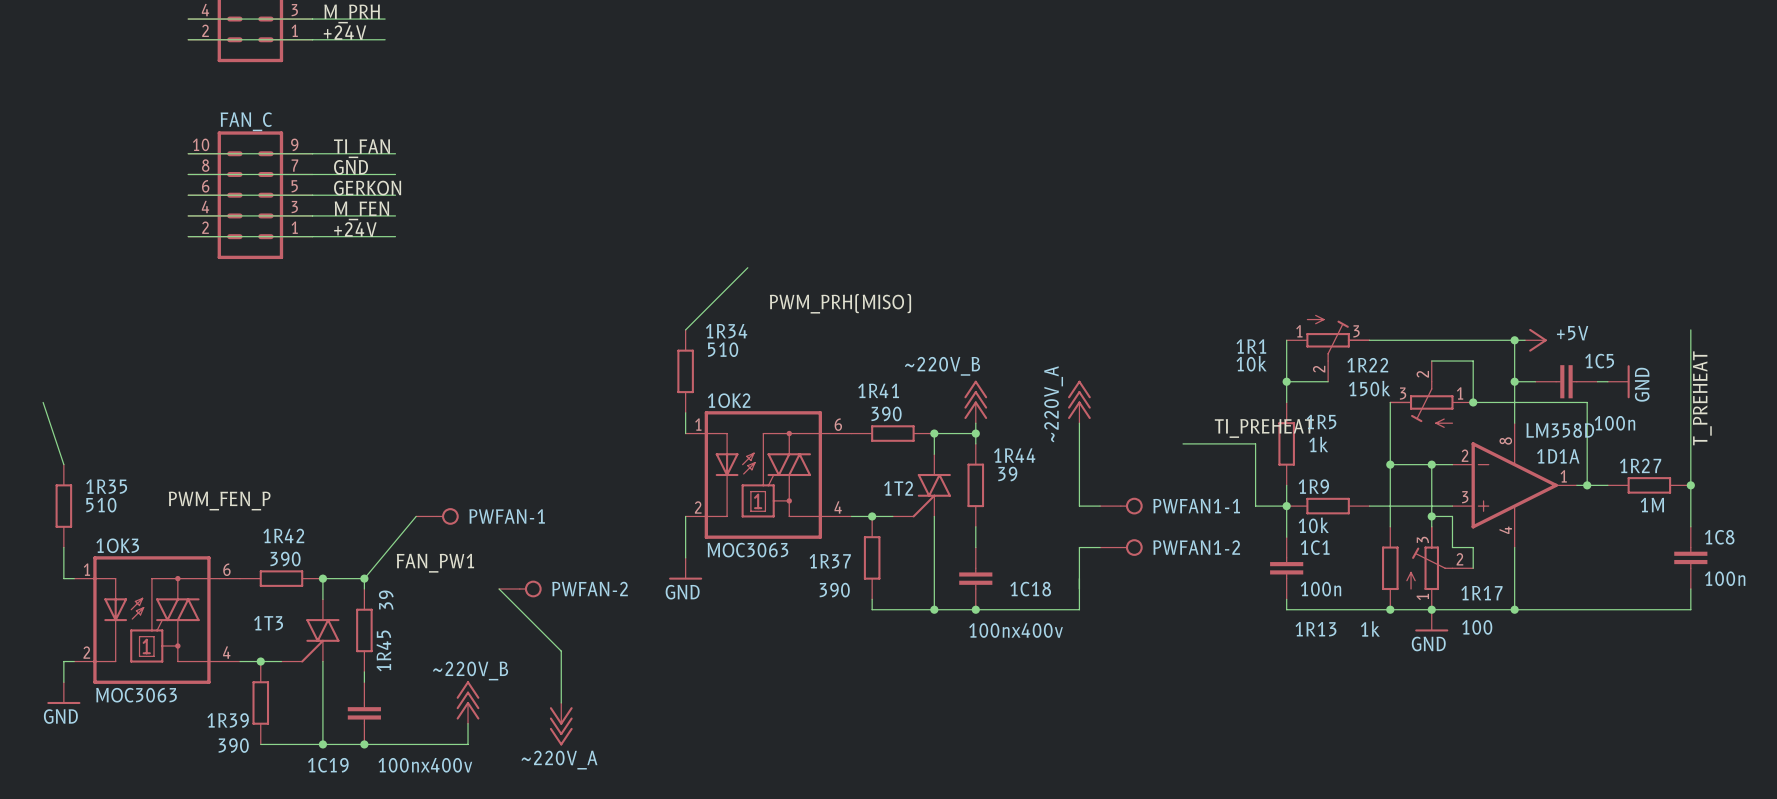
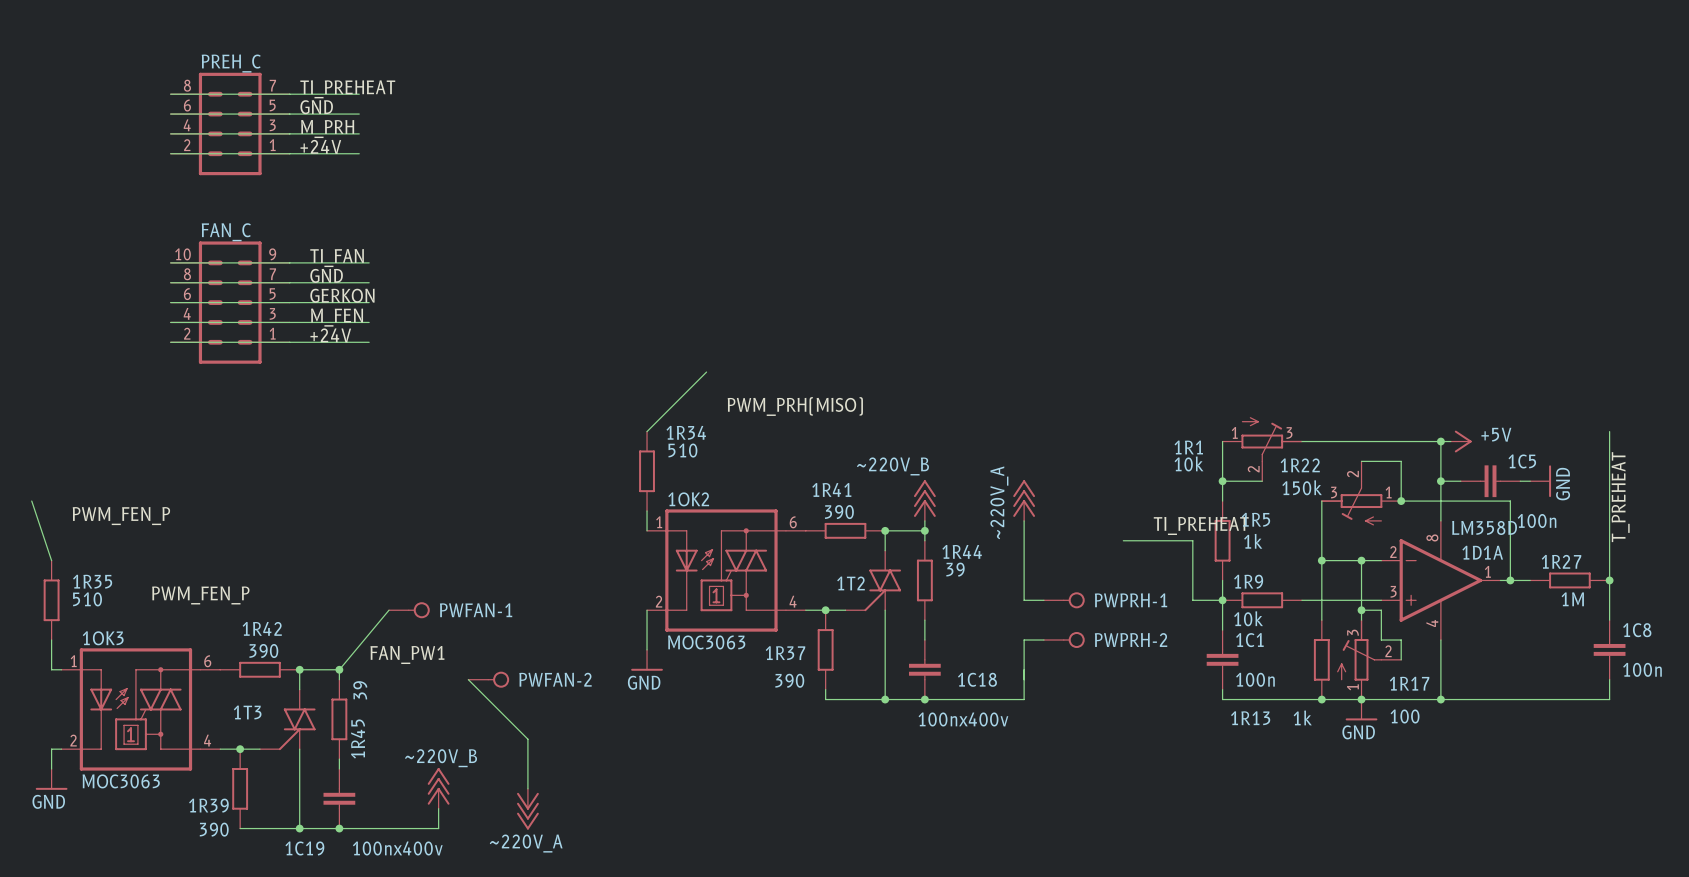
label: none -> PWM_FEN_P (121, 516)
PWFAN1-1 name: PWFAN1-1 (1196, 506) -> PWPRH-1 (1131, 600)
PWFAN1-2 name: PWFAN1-2 (1196, 547) -> PWPRH-2 (1131, 640)

